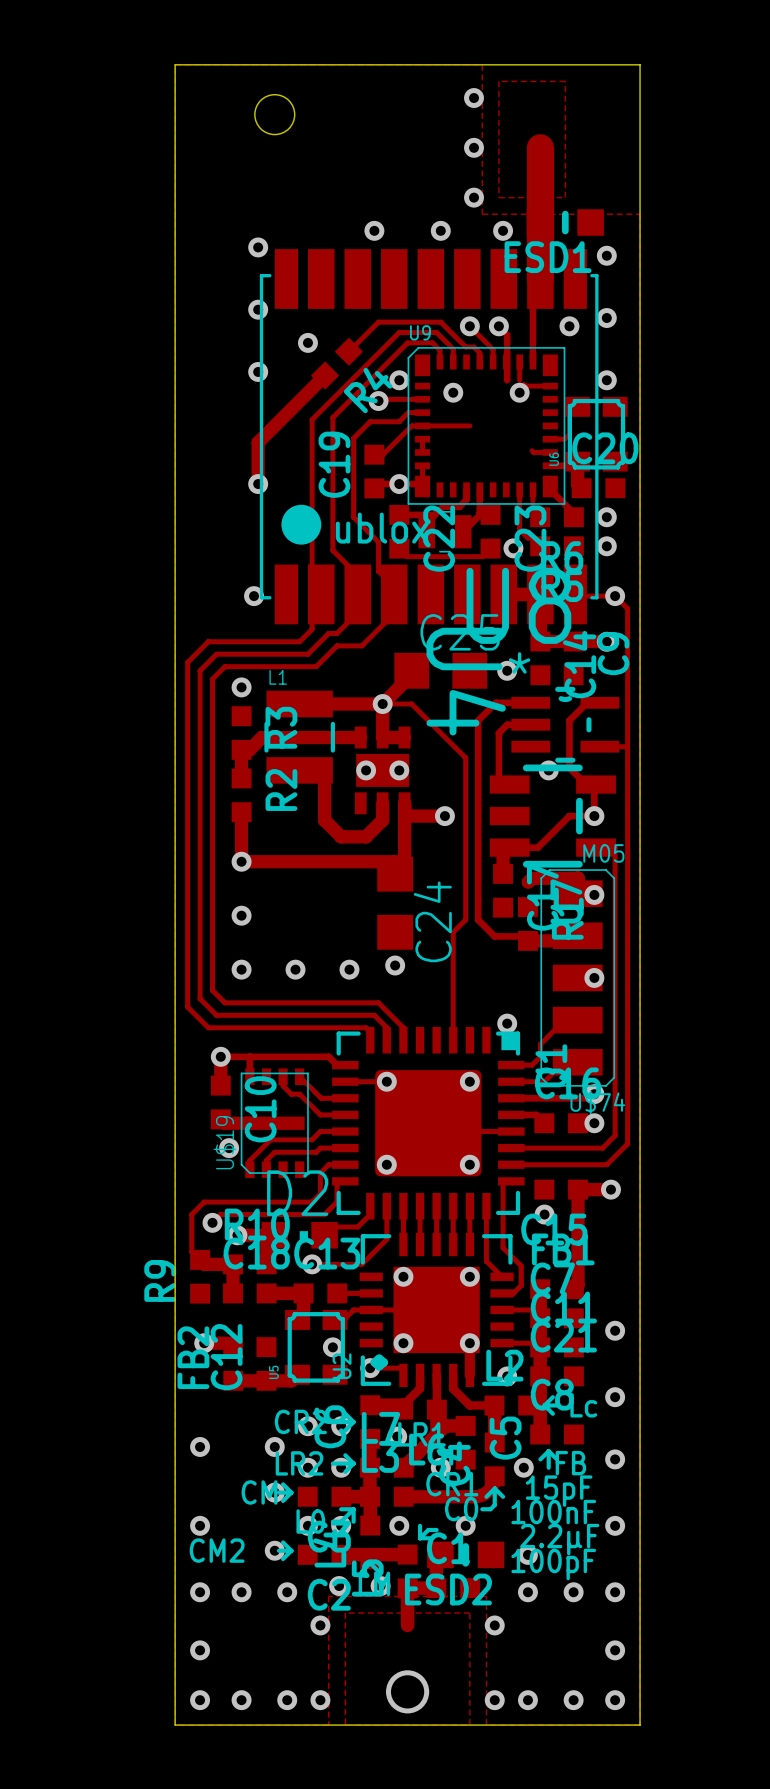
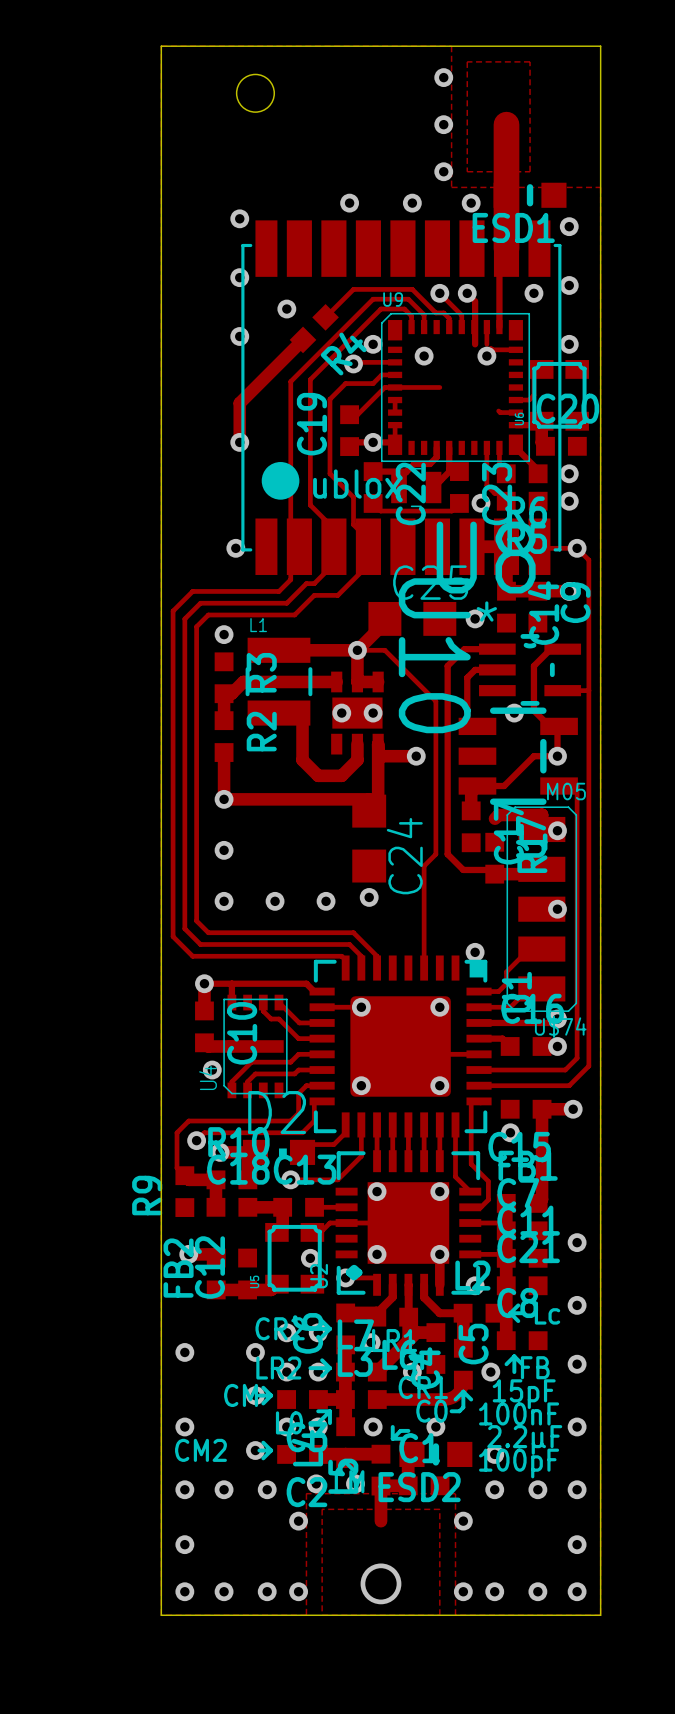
U4 name: U4 (466, 681) -> U10 (434, 655)
U$19 name: U$19 (224, 1142) -> U4 (208, 1077)

